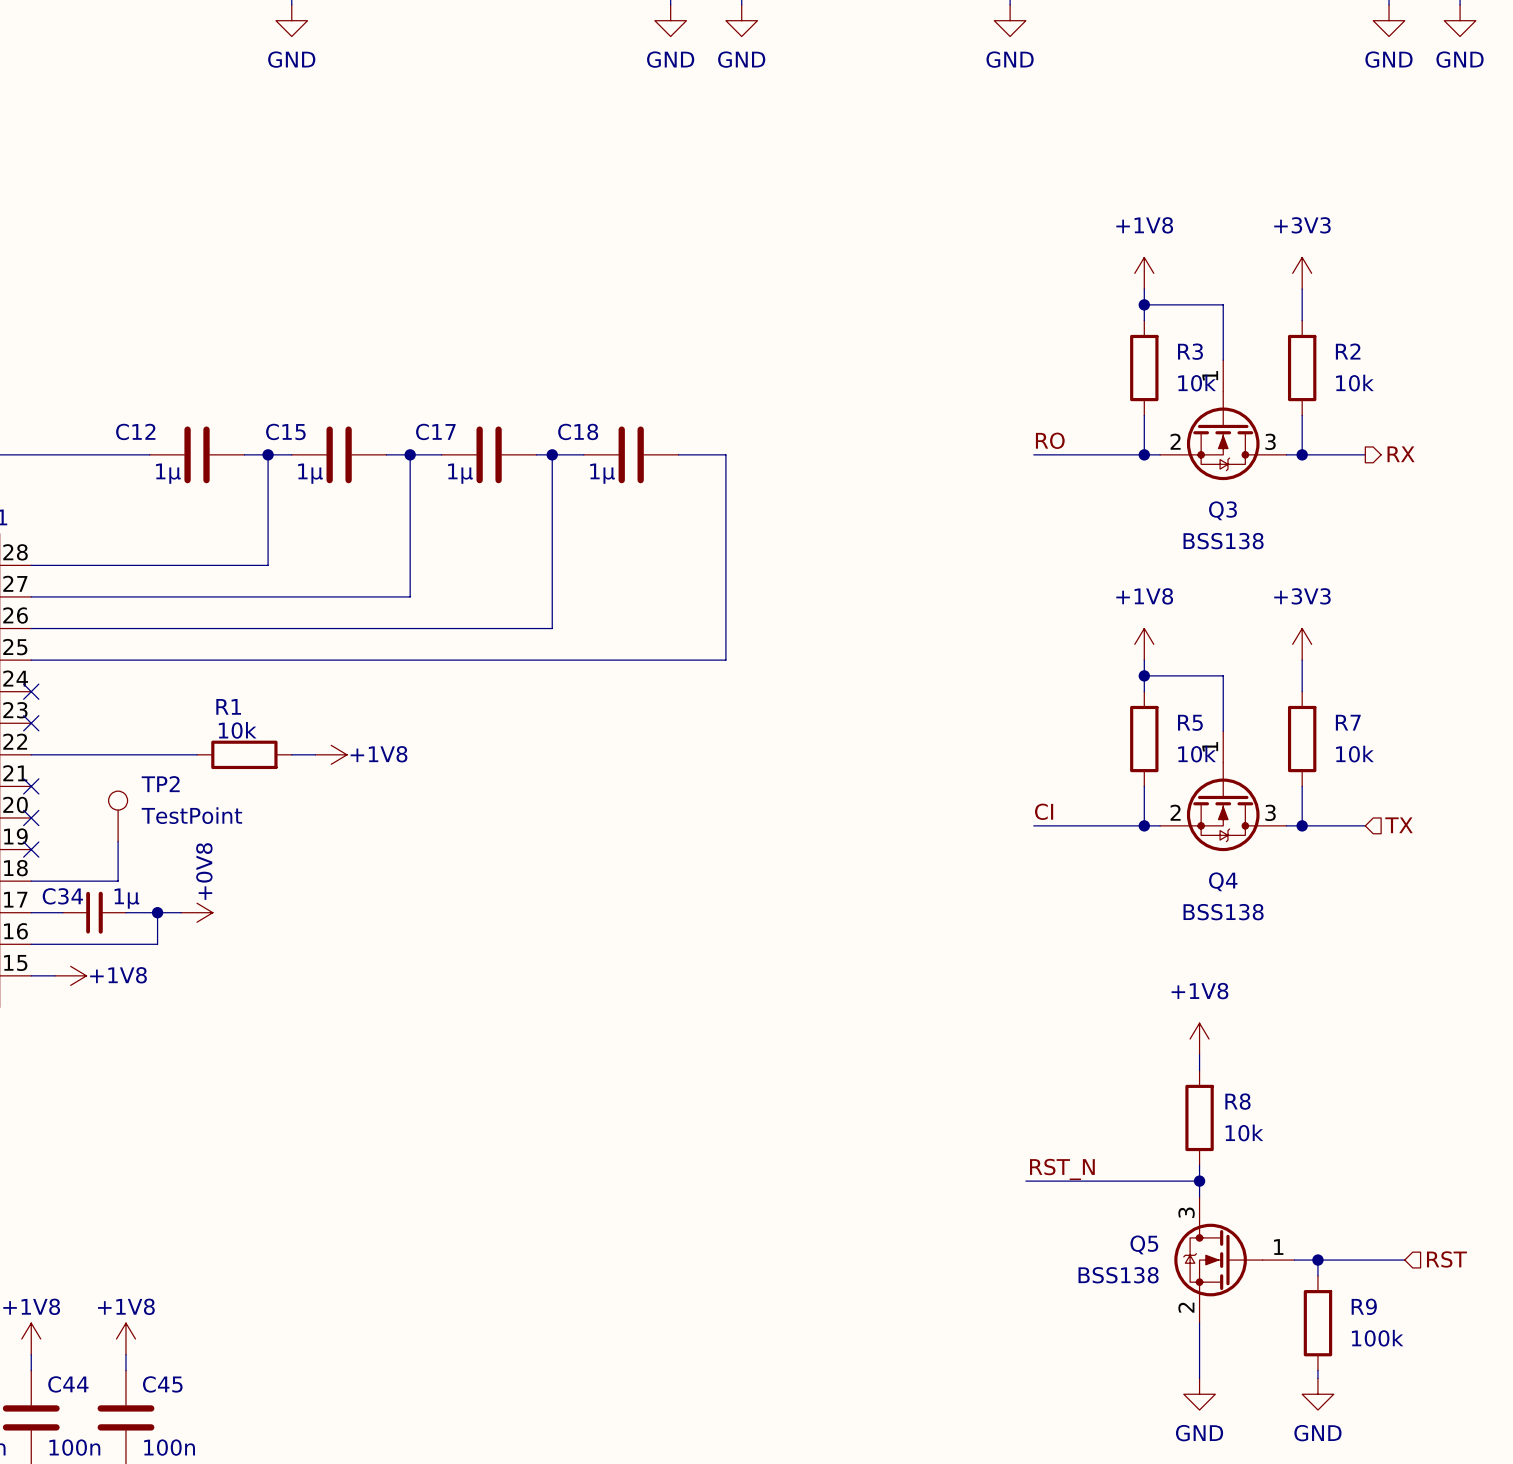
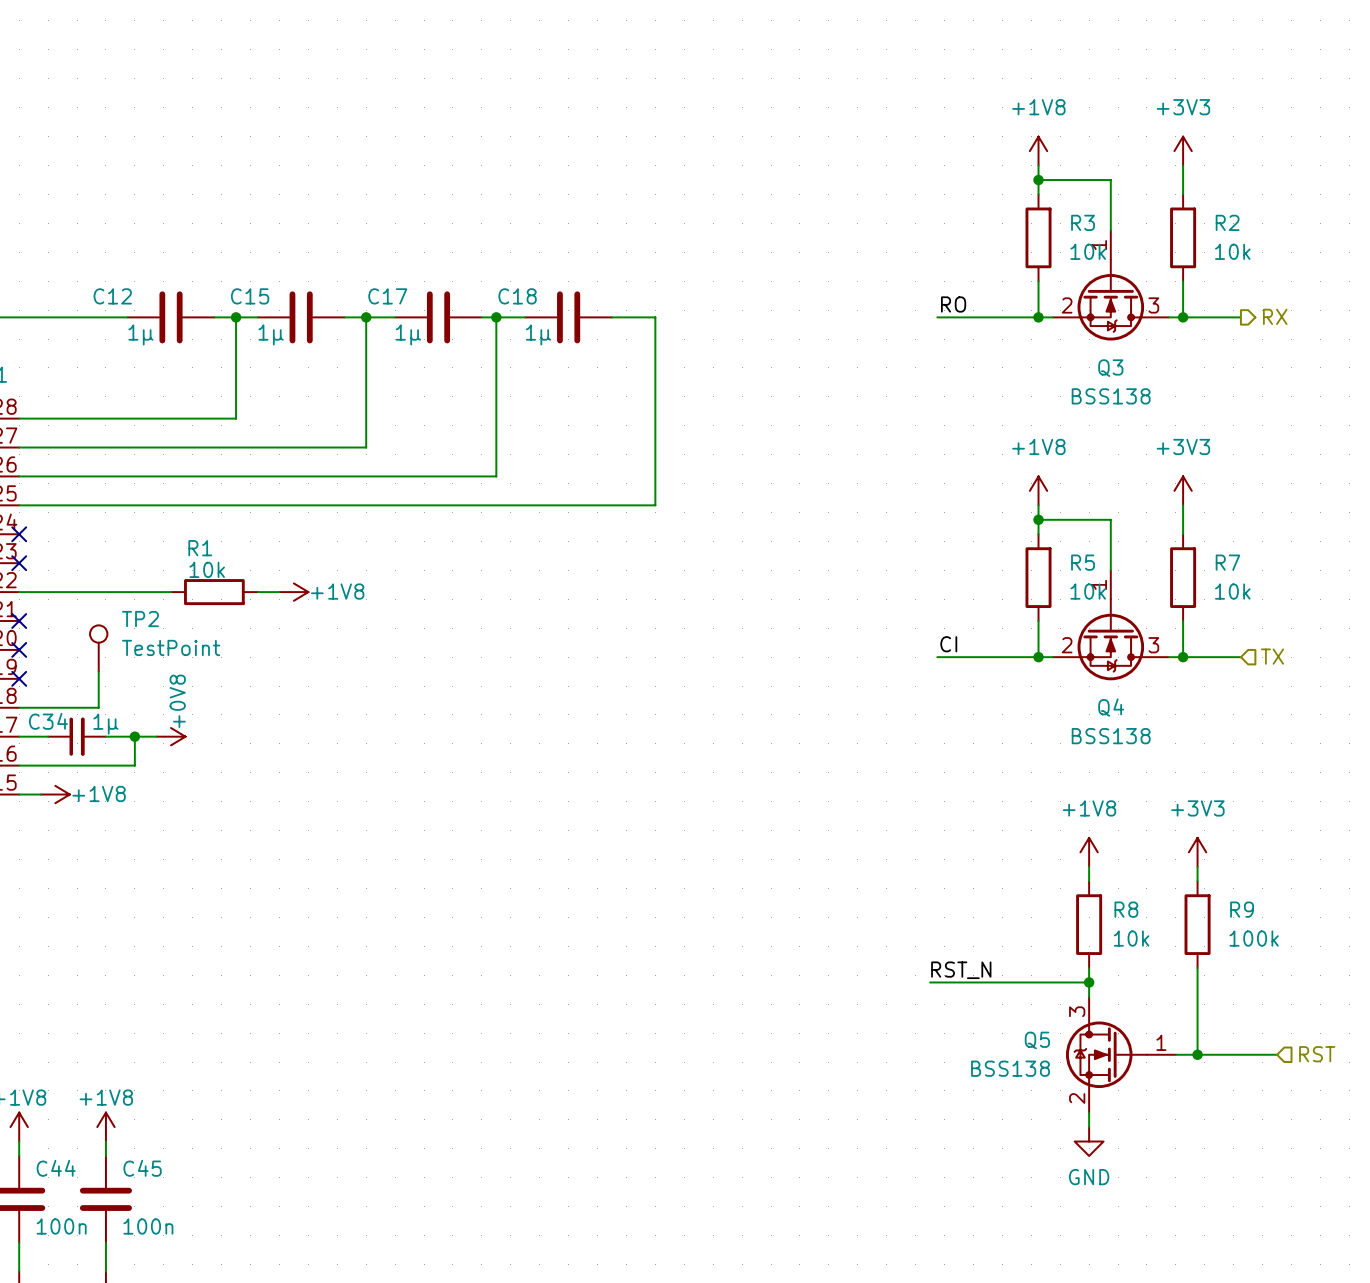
power symbol: none -> +3V3 (1197, 852)
wire: none -> (1197, 866) (1197, 881)
wire: (1317, 1260) (1317, 1275) -> (1197, 1054) (1197, 968)
R9 position: (1317, 1323) -> (1197, 924)
wire: (1199, 1338) (1199, 1378) -> none
wire: (1317, 1370) (1317, 1378) -> none
power symbol position: GND (1199, 1394) -> GND (1089, 1141)
power symbol: GND (1317, 1394) -> none

